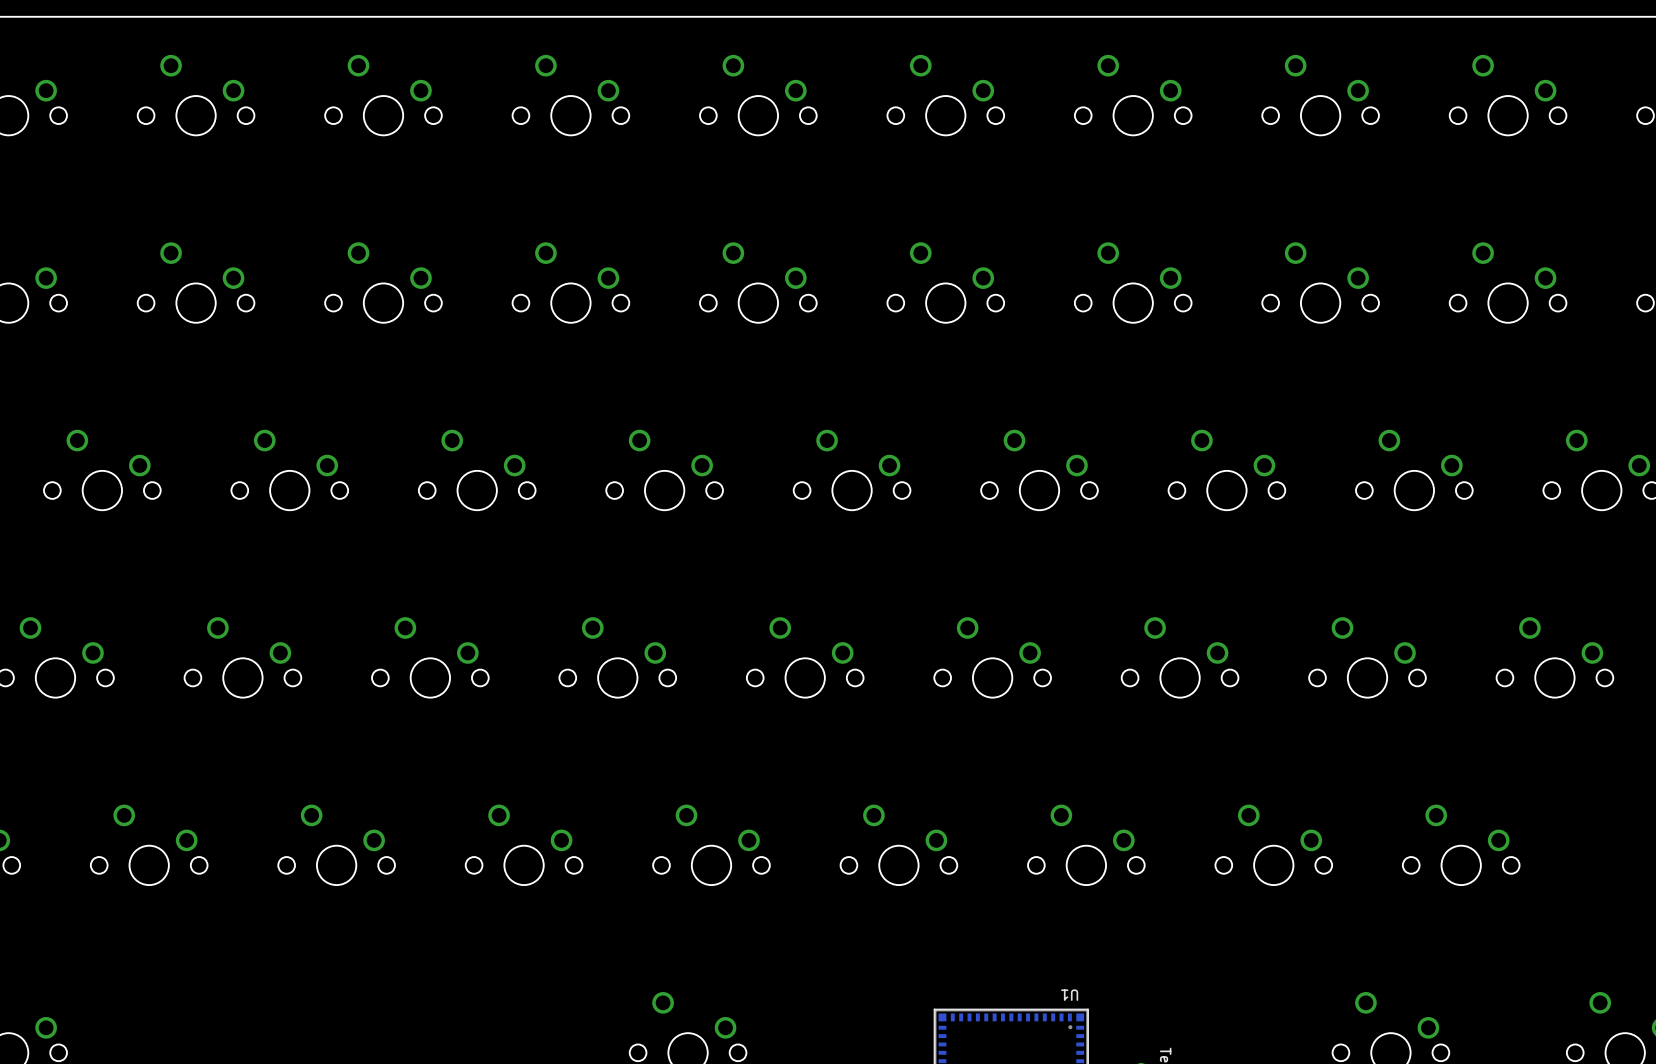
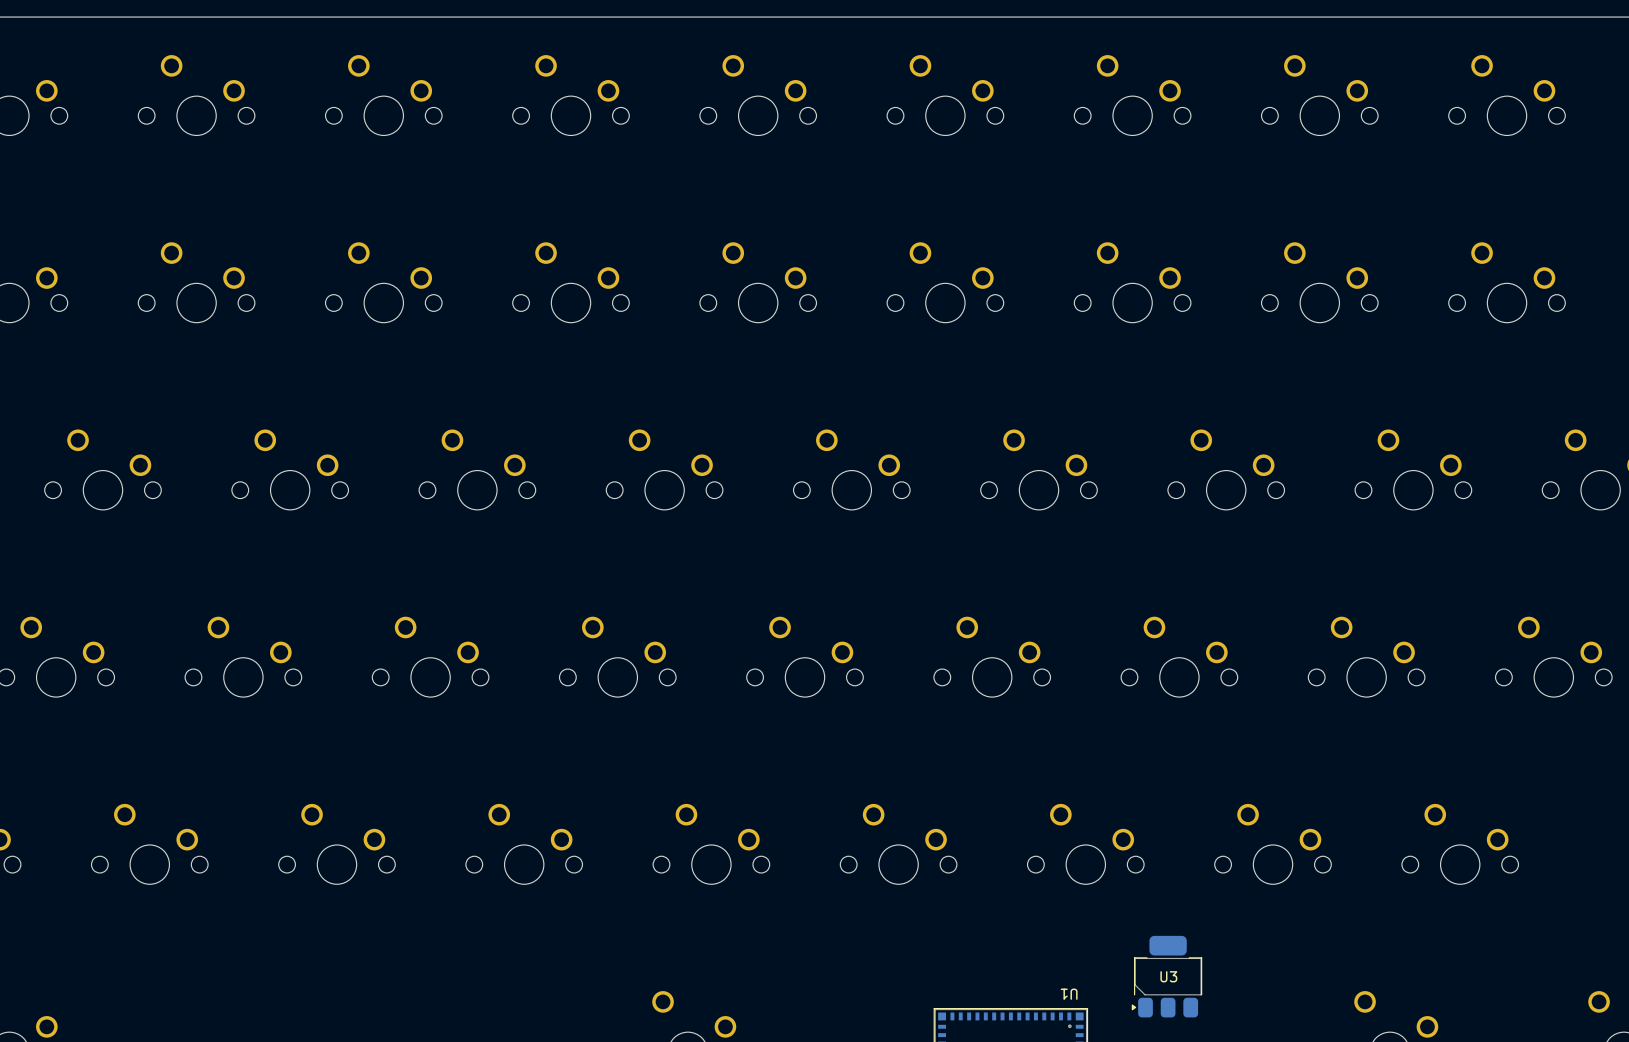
U3: none -> (1166, 976)

